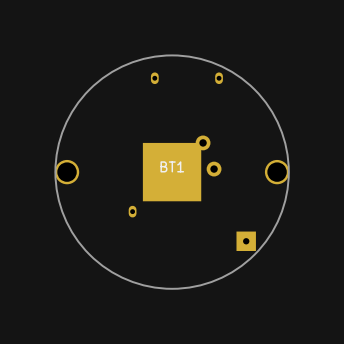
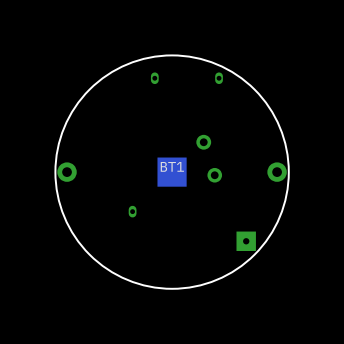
part footprint: [195, 135, 222, 177] -> [196, 134, 223, 183]
BT1 footprint: [54, 142, 290, 202] -> [57, 157, 287, 187]

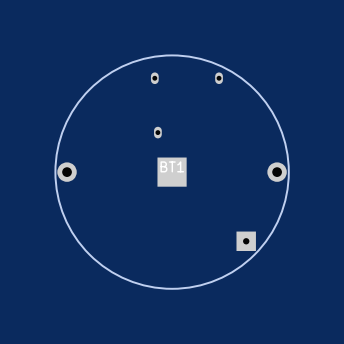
part: (209, 158) -> none
part position: (132, 211) -> (157, 132)

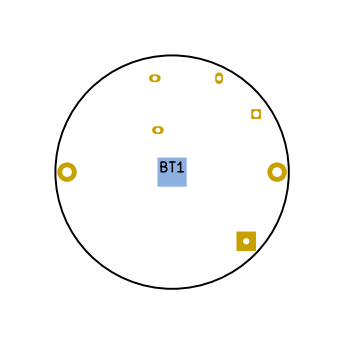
part rotation: 0° (154, 78) -> 90° clockwise (154, 78)
part: none -> (256, 114)
part rotation: 0° (157, 132) -> 90° clockwise (157, 130)

